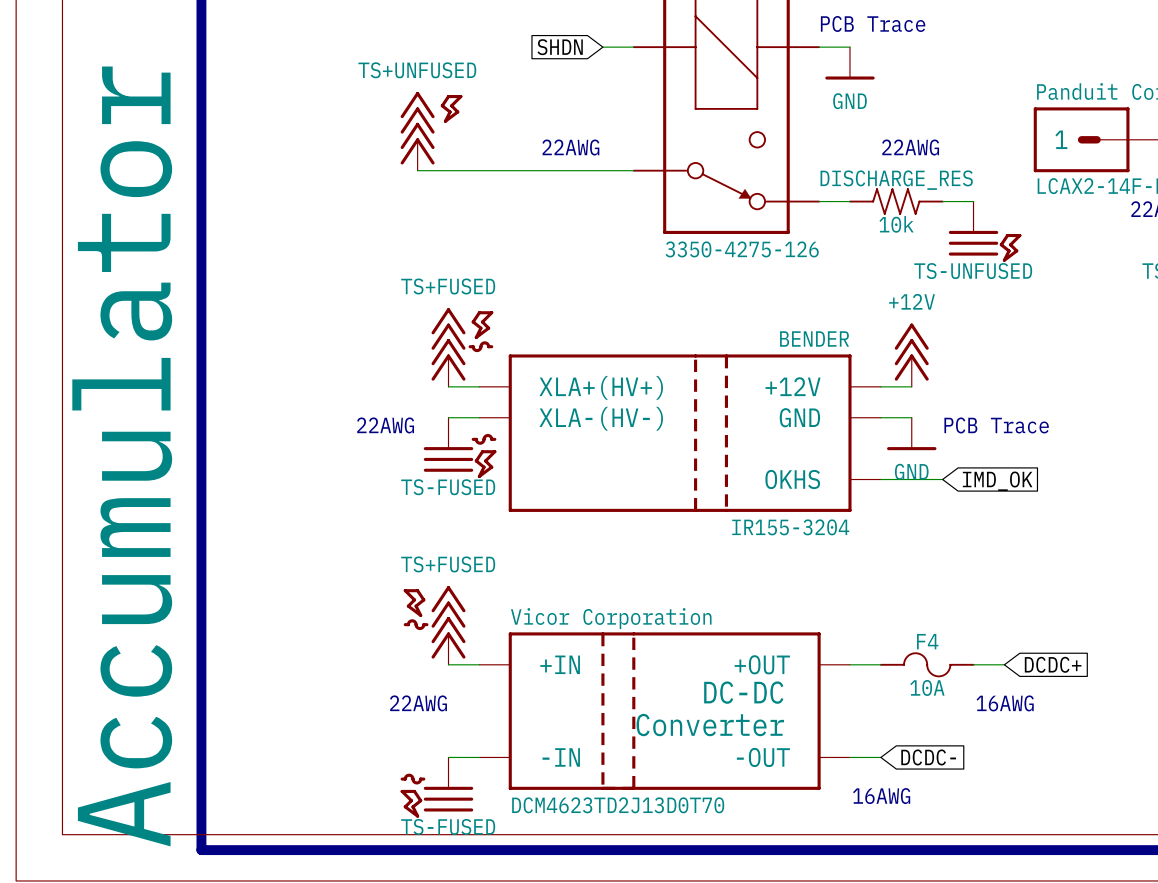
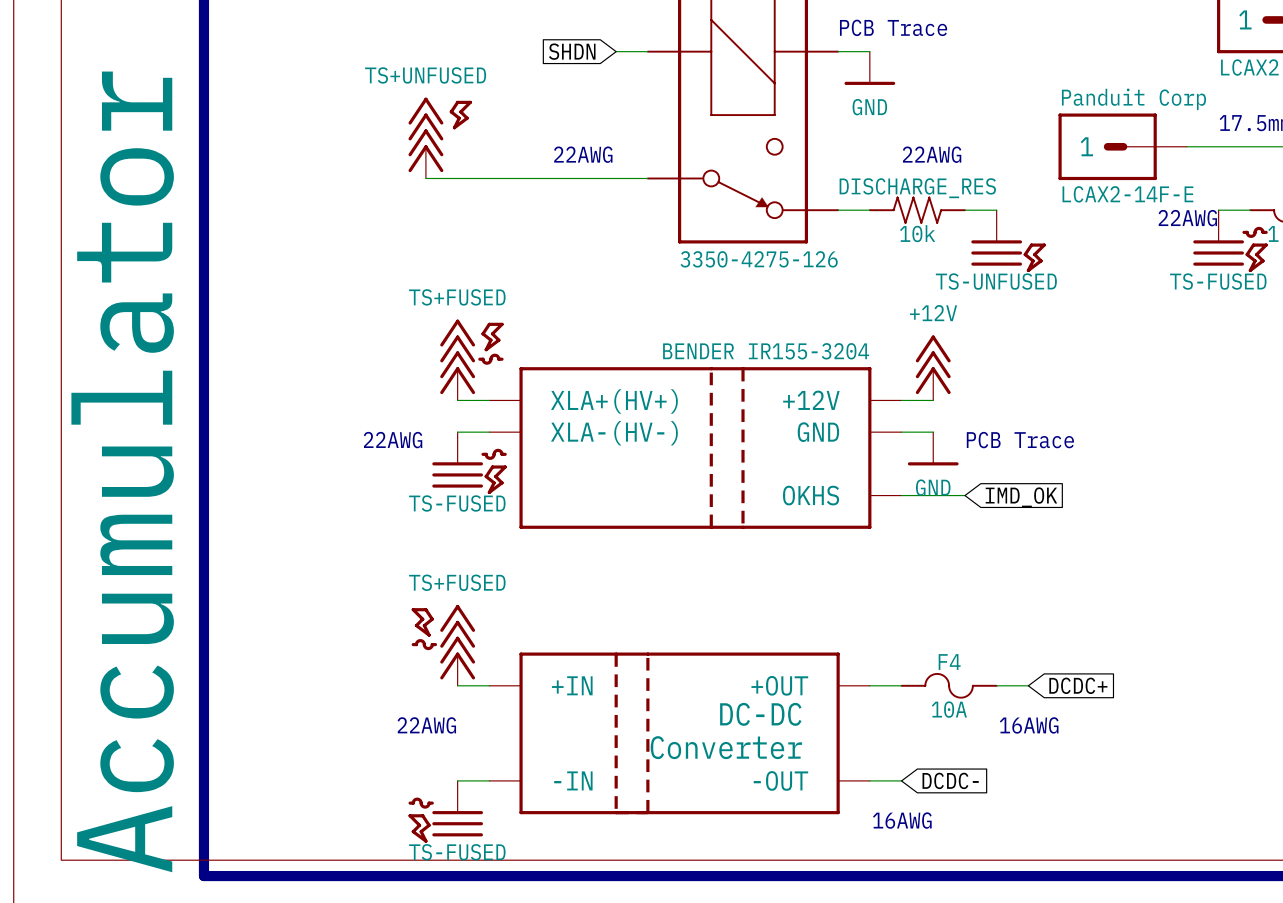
part text: BENDER (814, 338) -> BENDER IR155-3204 (766, 351)
part text: IR155-3204 (790, 527) -> none
part text: Vicor Corporation (611, 618) -> none
part text: DCM4623TD2J13D0T70 (618, 805) -> none

